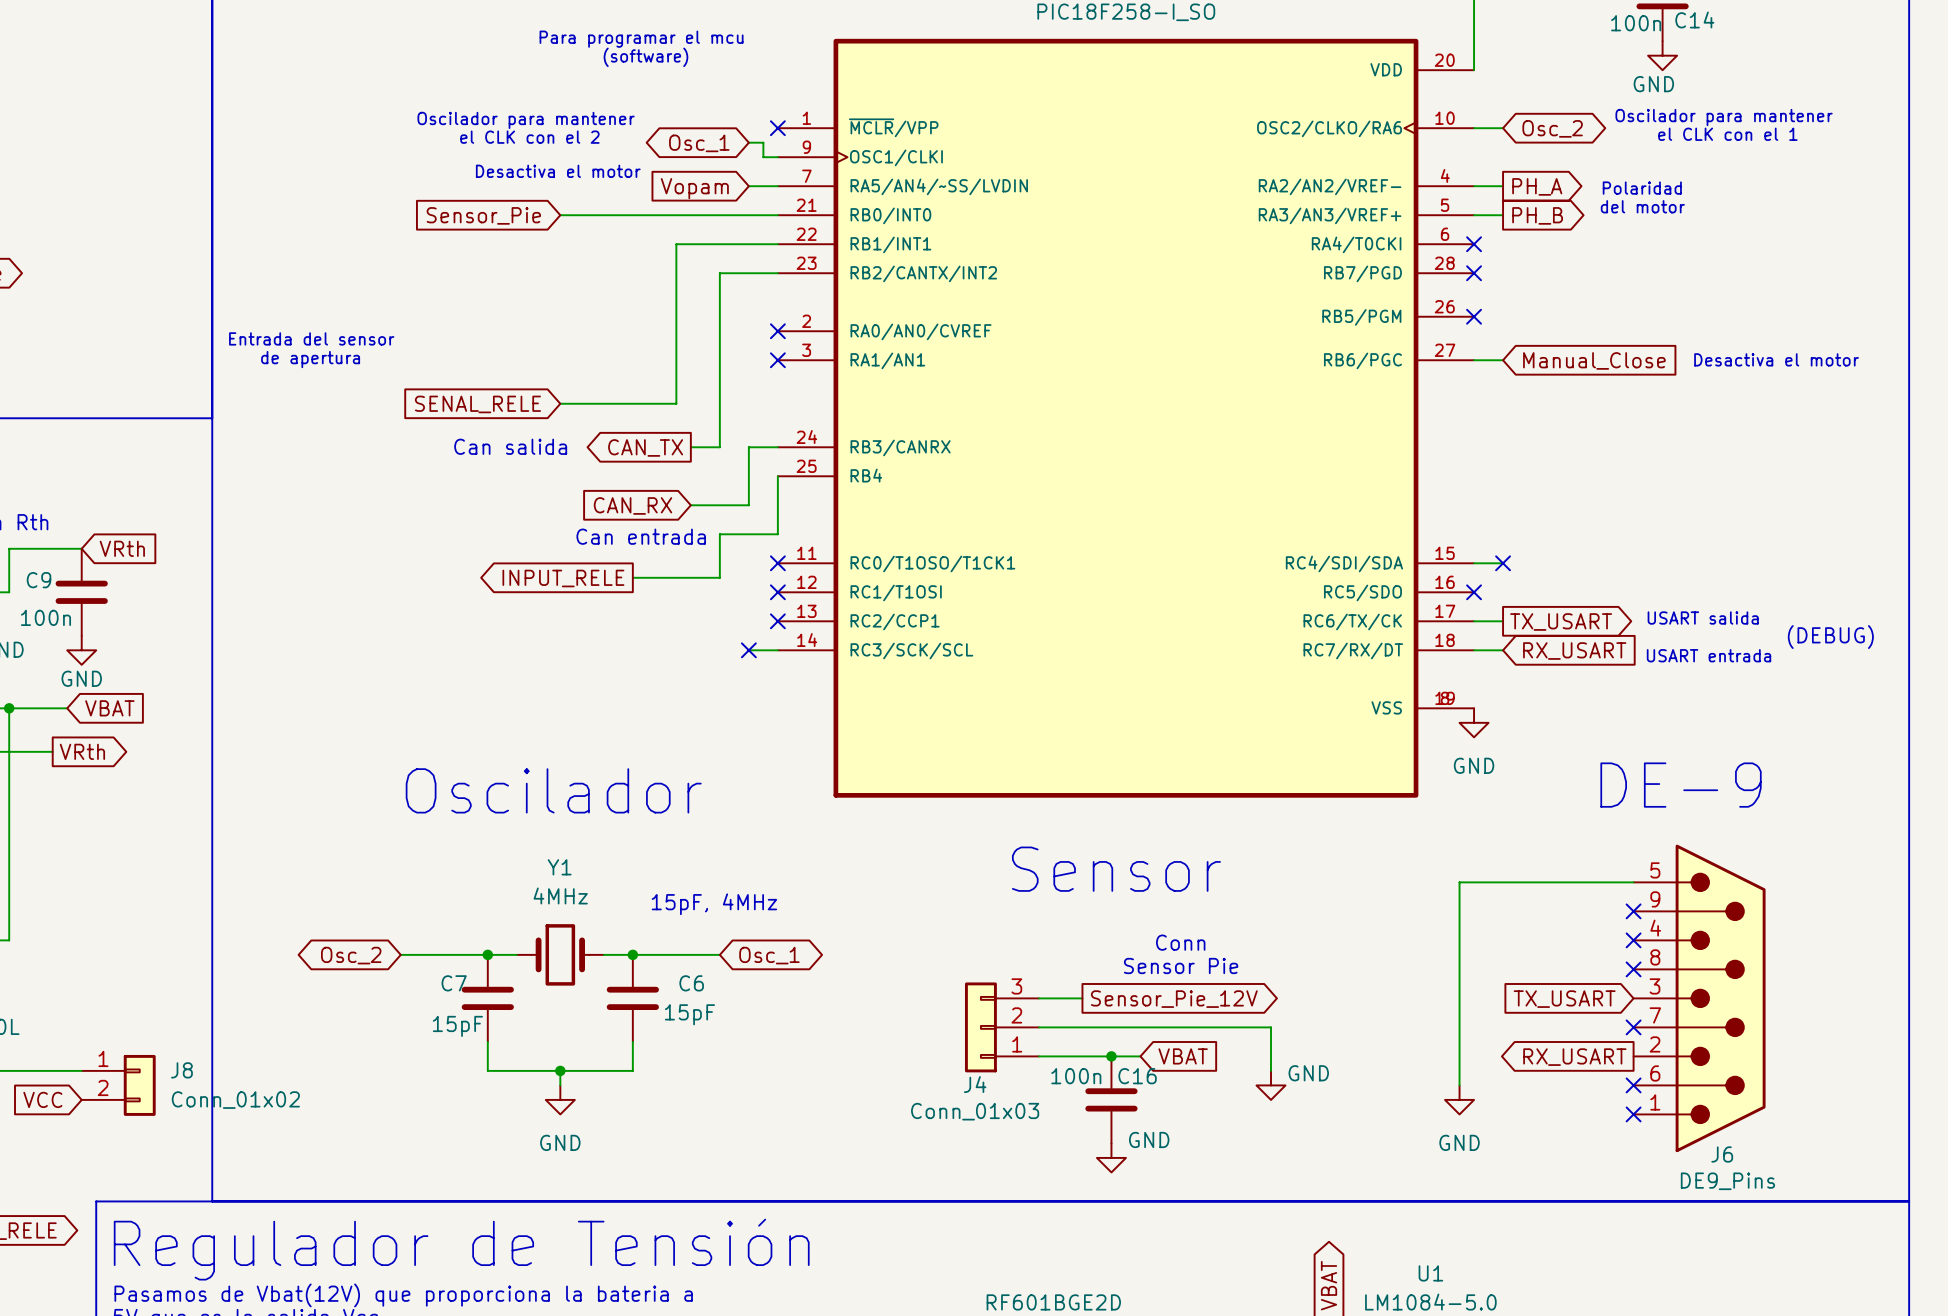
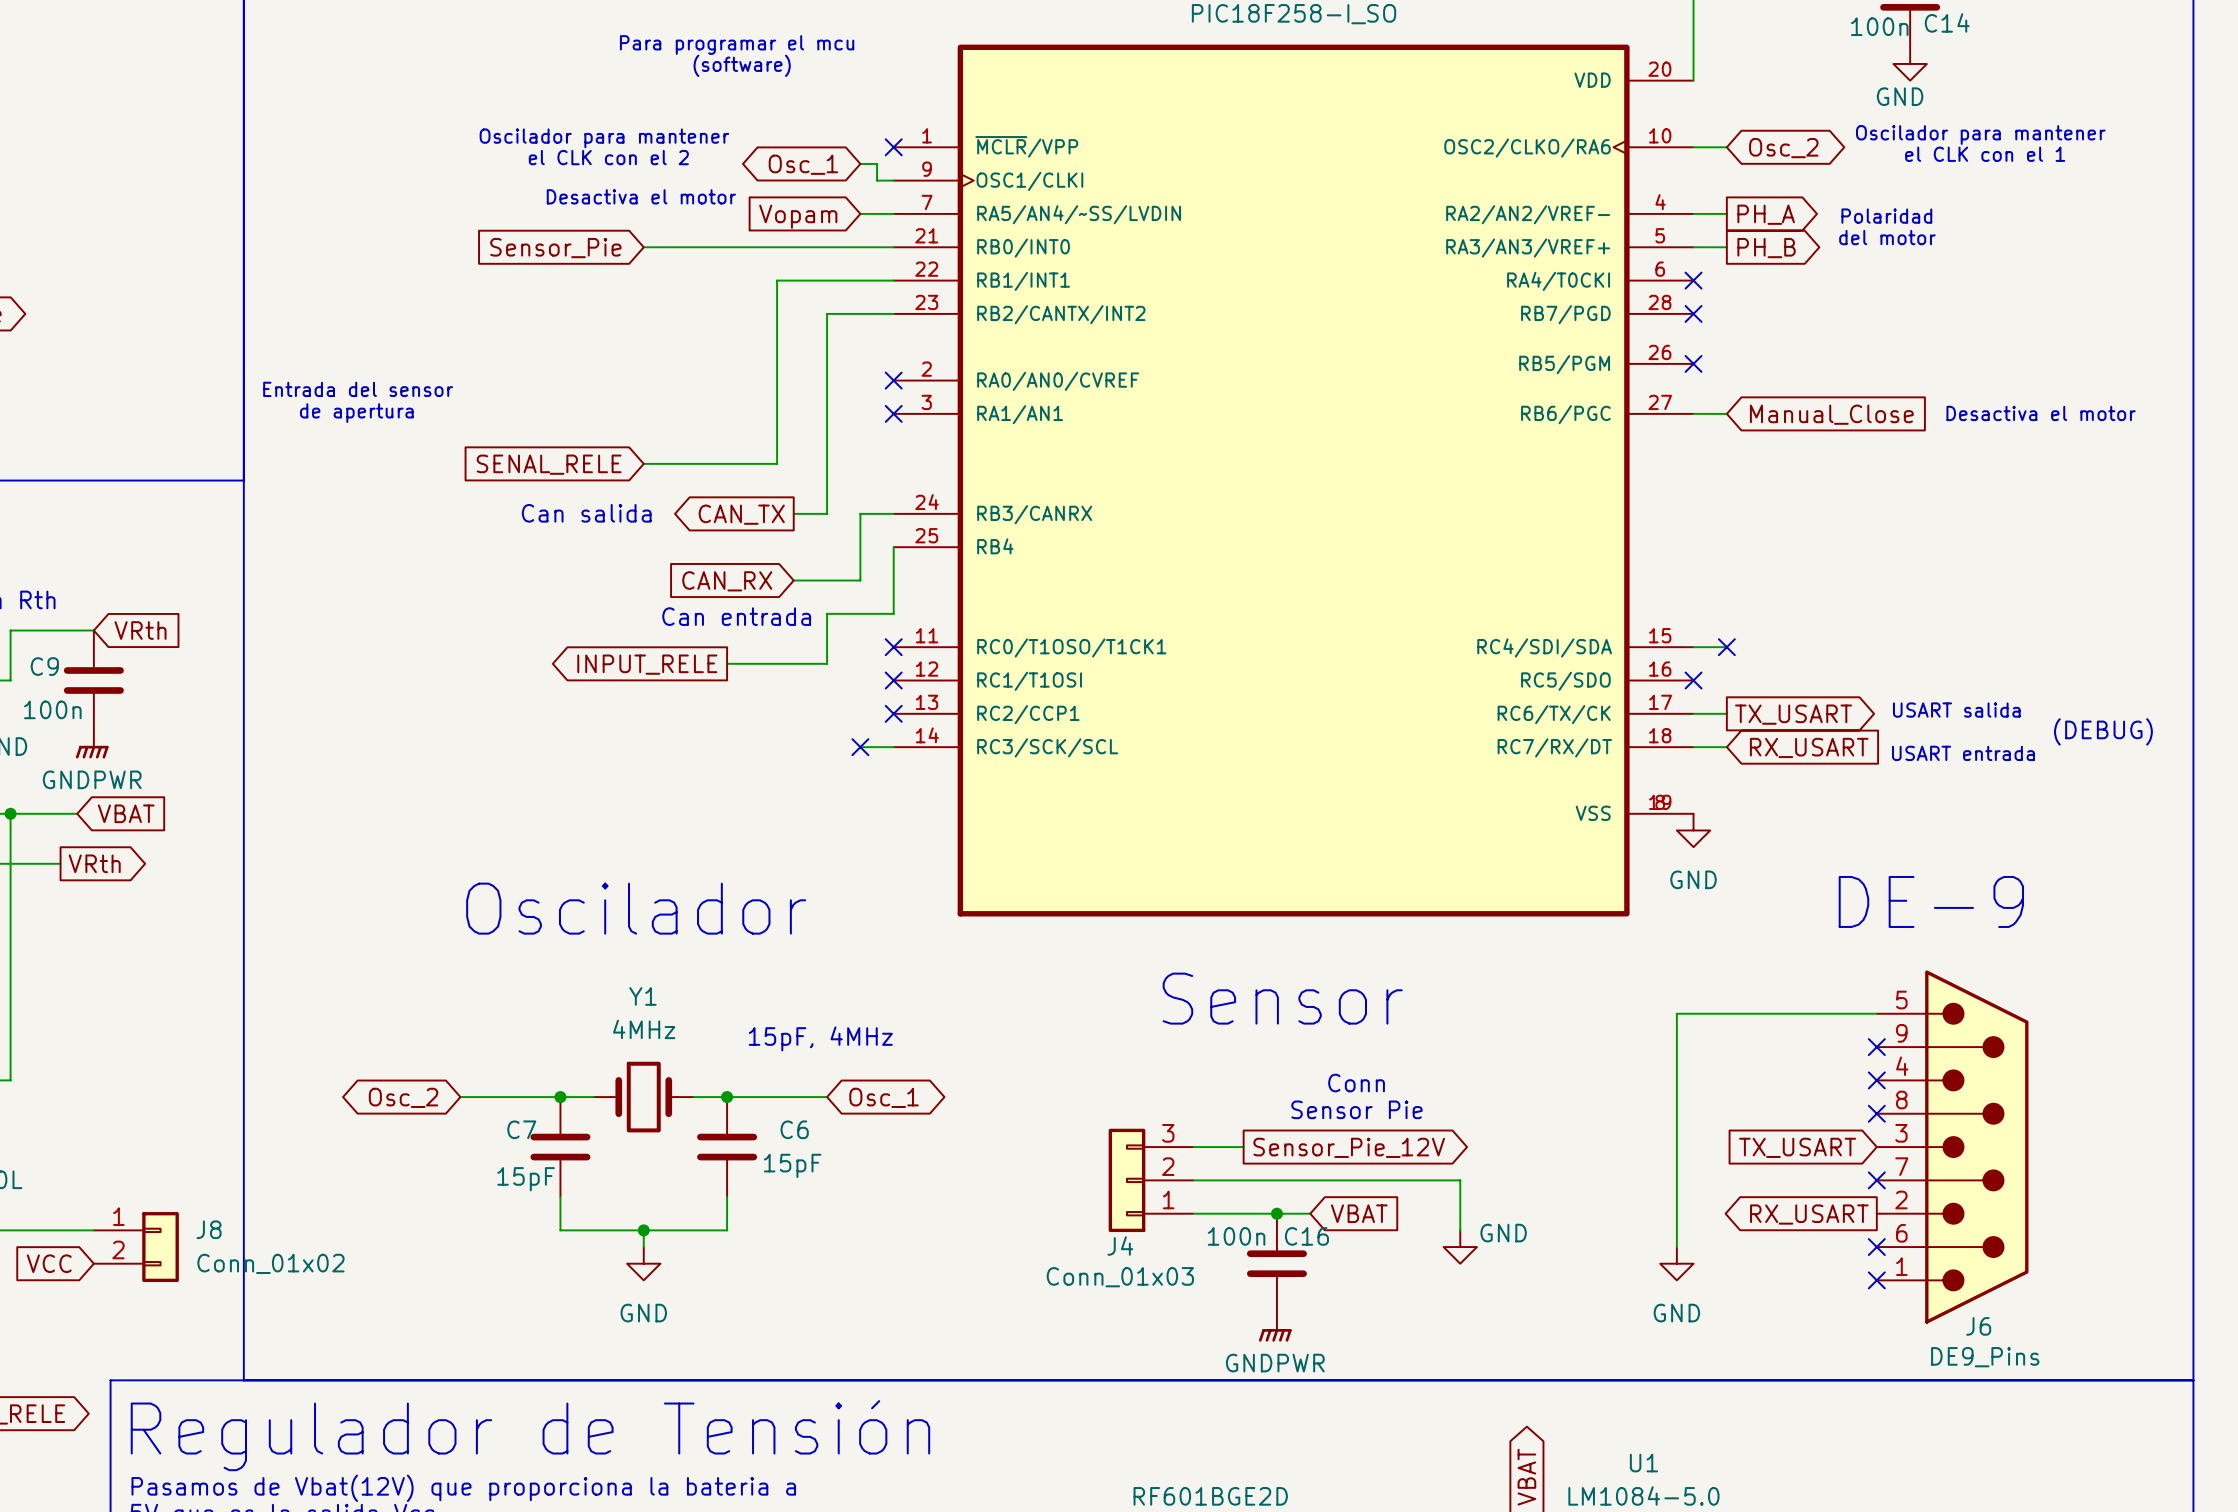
power symbol: GND (81, 650) -> GNDPWR (92, 744)
power symbol: GND (1111, 1157) -> GNDPWR (1275, 1327)

